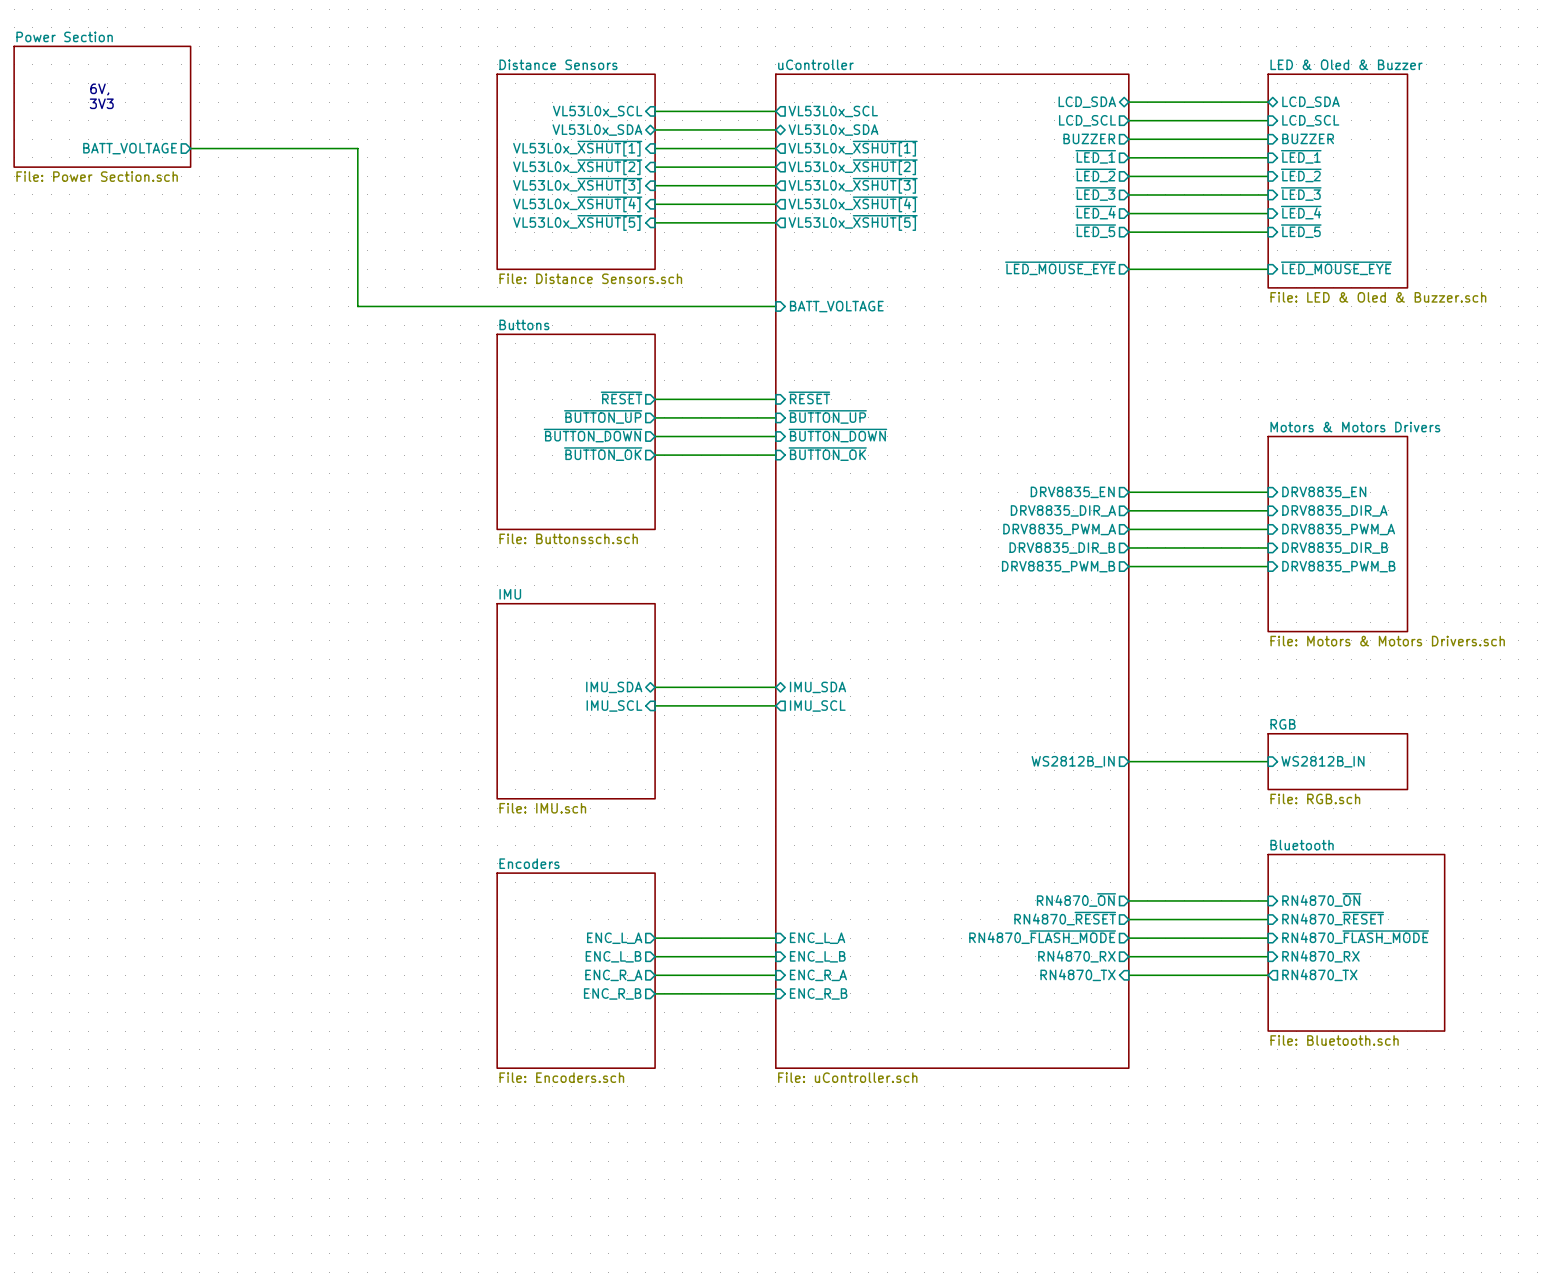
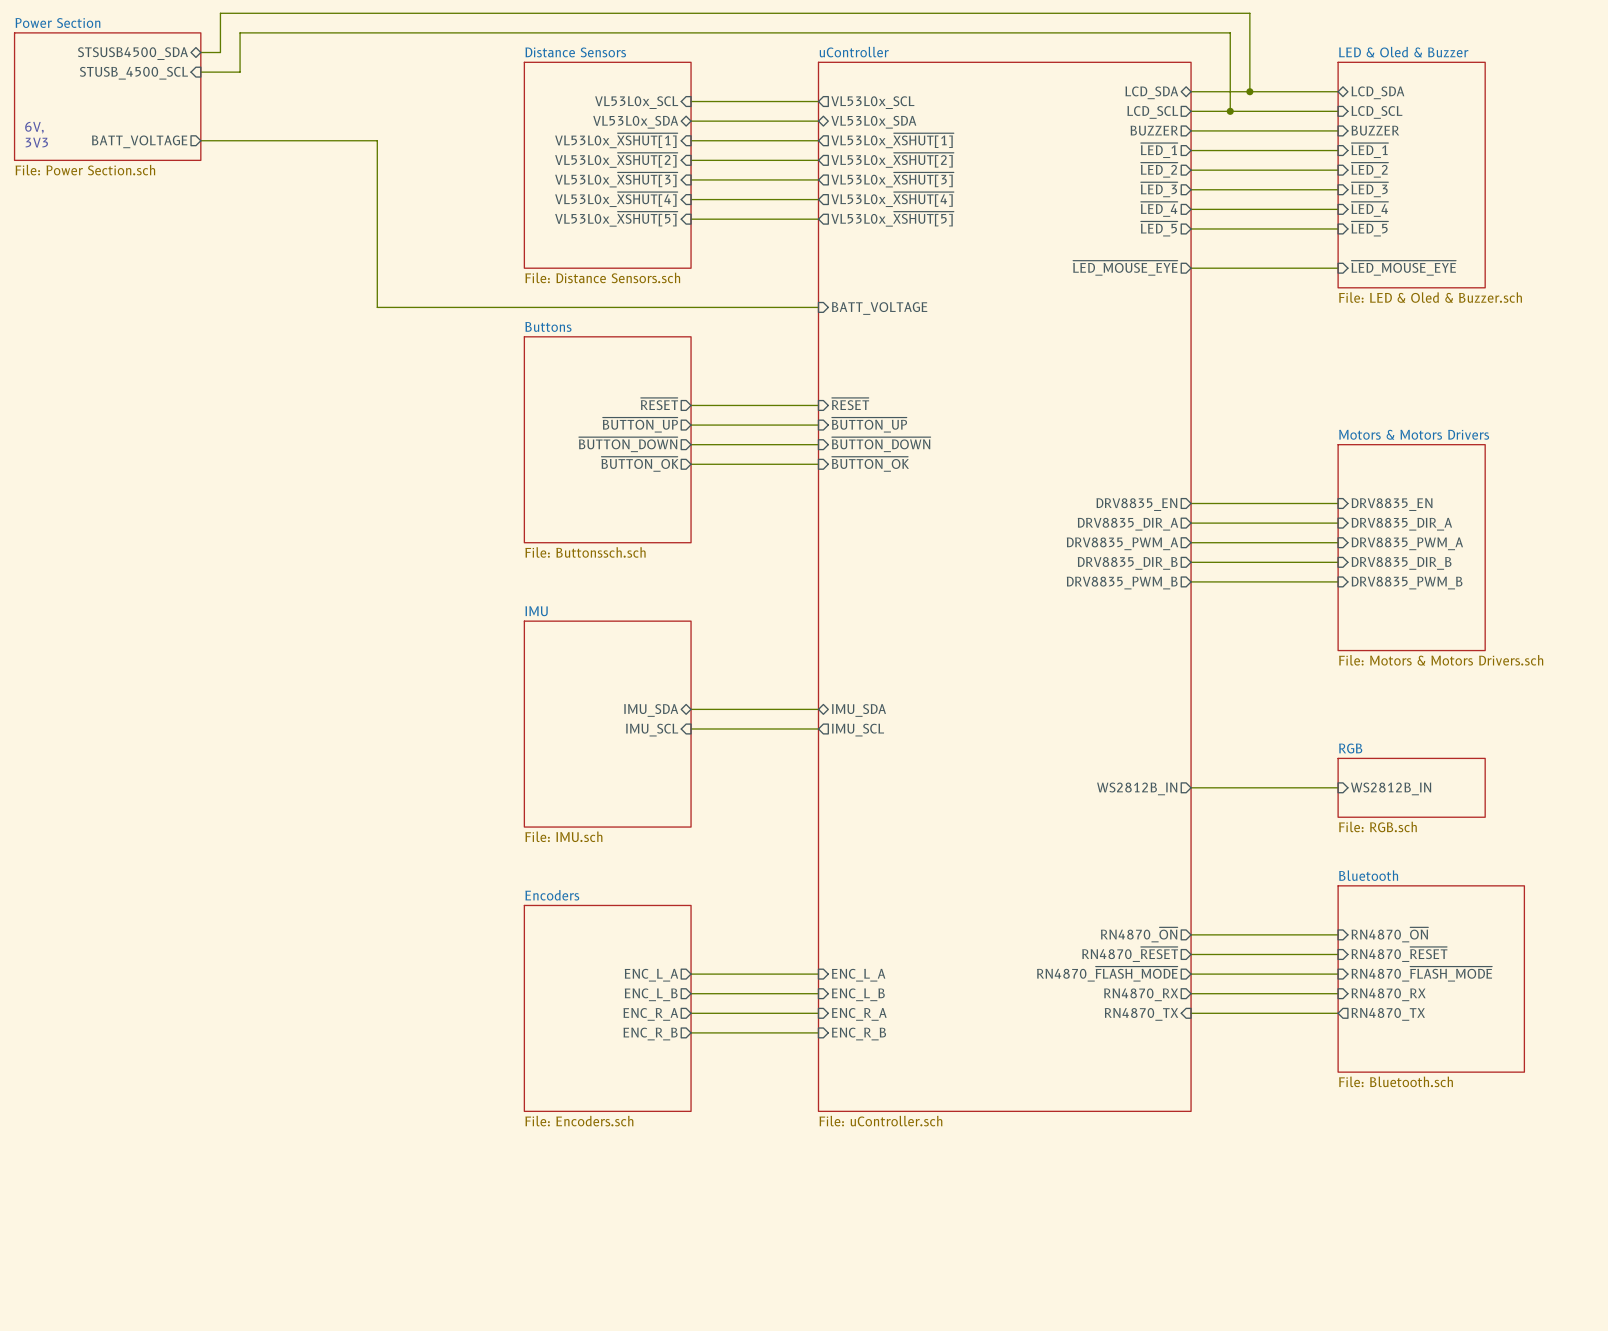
sheet pin: none -> STSUSB4500_SDA (132, 53)
wire: none -> (200, 52) (220, 52) (220, 13) (1249, 13) (1249, 91)
sheet pin: none -> STUSB_4500_SCL (133, 73)
wire: none -> (200, 72) (240, 72) (240, 32) (1230, 32) (1230, 111)
text position: 6V, (99, 89) -> 6V, (34, 127)
junction: none -> (1249, 91)
text position: 3V3 (101, 103) -> 3V3 (36, 142)
junction: none -> (1230, 111)

